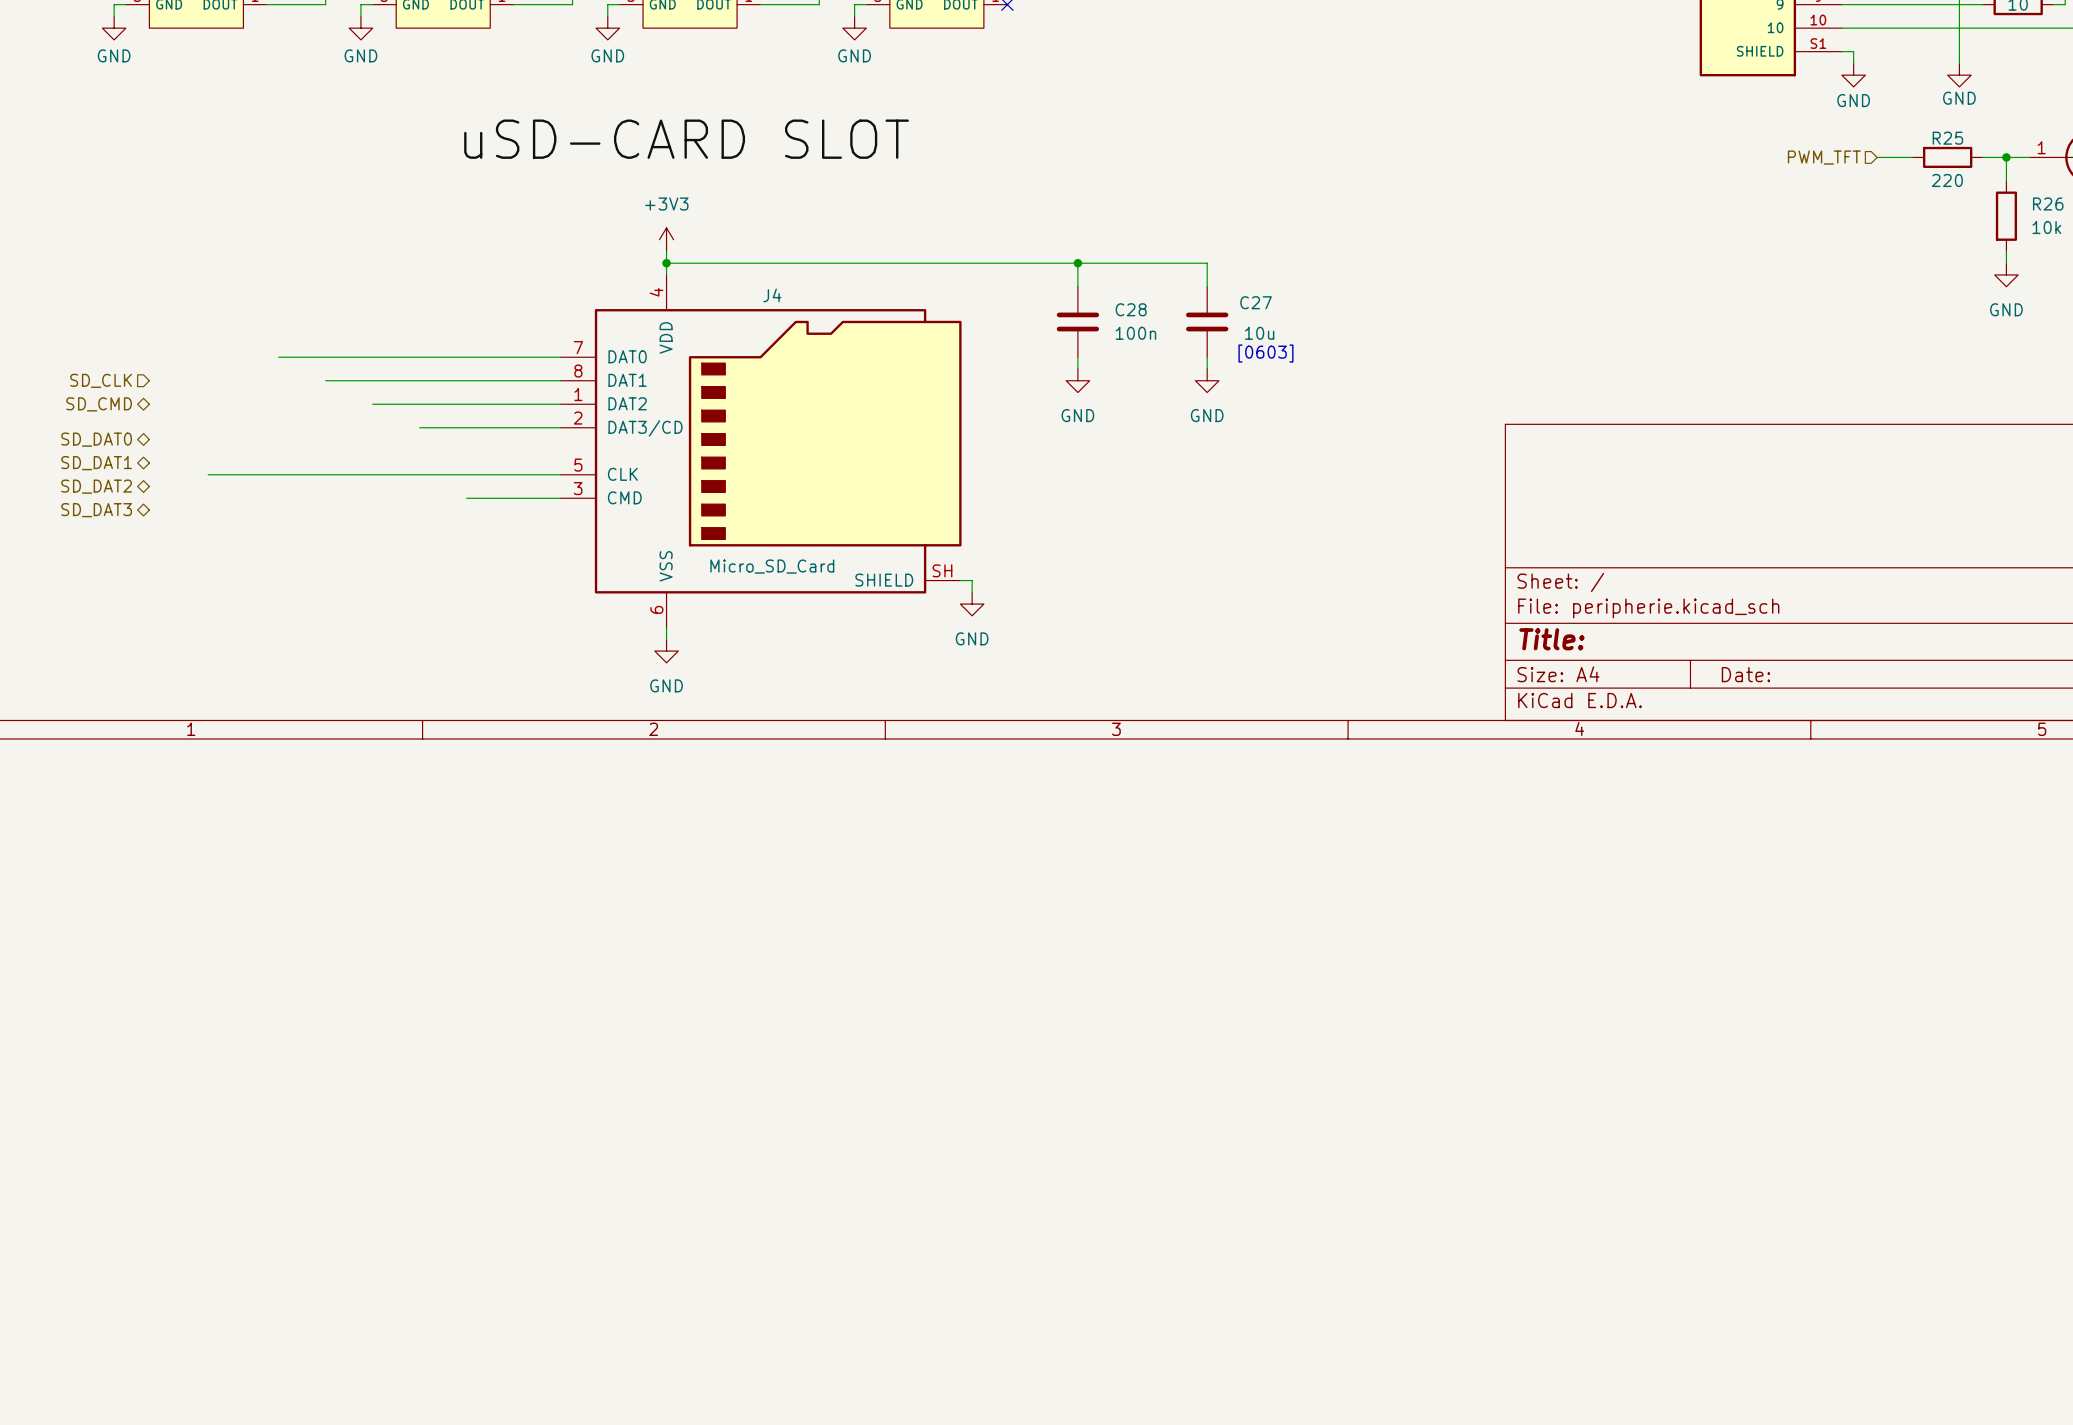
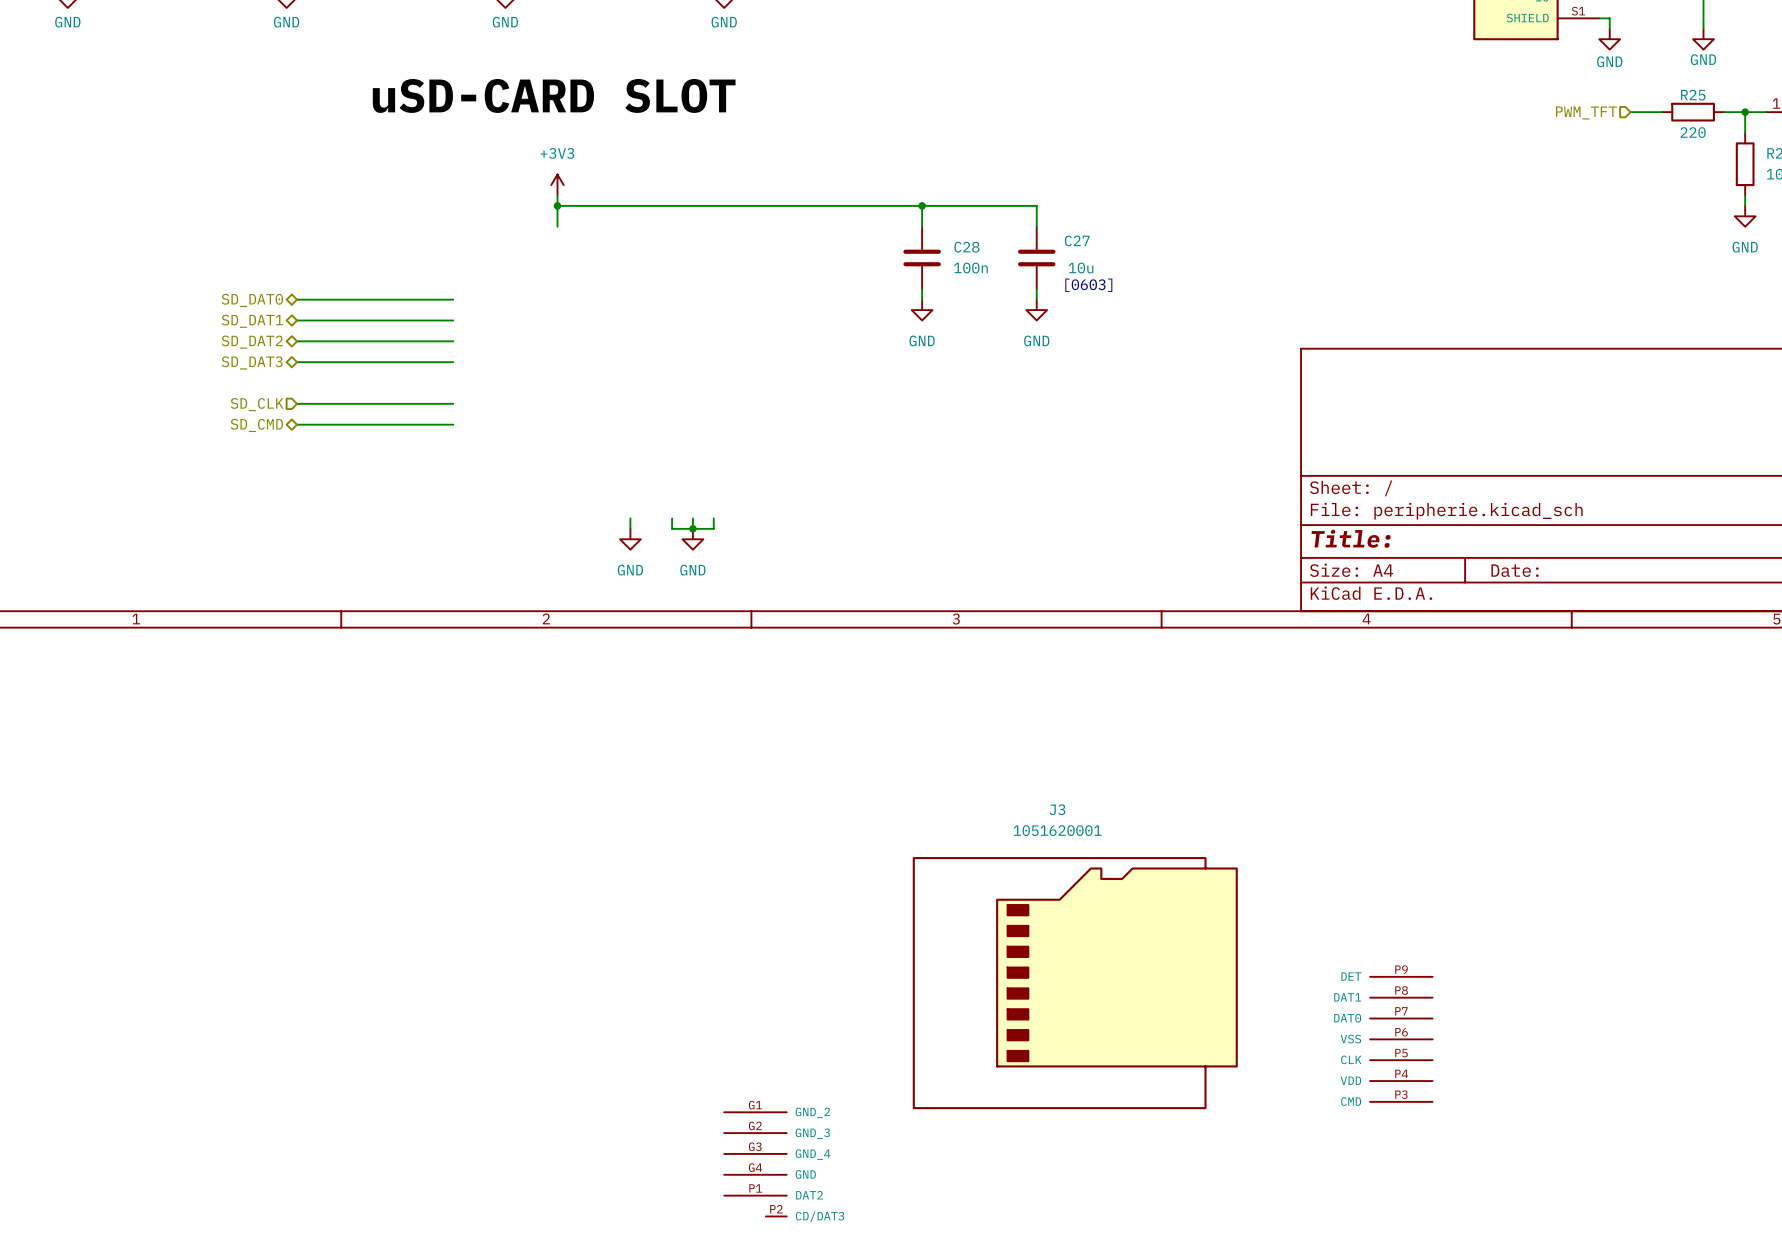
wire: (278, 357) (560, 357) -> none
wire: none -> (297, 299) (453, 299)
hierarchical label: none -> SD_DAT0 (252, 300)
hierarchical label: SD_CLK (101, 380) -> none
wire: (325, 380) (560, 380) -> none
hierarchical label: none -> SD_DAT1 (252, 321)
wire: none -> (297, 320) (453, 320)
hierarchical label: SD_CMD (99, 404) -> none
wire: (372, 404) (560, 404) -> none
hierarchical label: none -> SD_DAT2 (252, 342)
wire: none -> (297, 341) (453, 341)
wire: (419, 427) (560, 427) -> none
hierarchical label: SD_DAT0 (96, 439) -> none
hierarchical label: none -> SD_DAT3 (252, 362)
wire: none -> (297, 362) (453, 362)
J4: Micro_SD_Card (761, 451) -> none
hierarchical label: SD_DAT1 (96, 463) -> none
wire: (208, 474) (560, 474) -> none
hierarchical label: SD_DAT2 (96, 486) -> none
hierarchical label: none -> SD_CLK (257, 404)
wire: none -> (297, 403) (453, 403)
wire: (466, 498) (560, 498) -> none
hierarchical label: SD_DAT3 (96, 510) -> none
hierarchical label: none -> SD_CMD (256, 425)
wire: none -> (297, 424) (453, 424)
wire: (960, 580) (972, 580) (972, 592) -> none
power symbol: GND (972, 604) -> none
wire: none -> (672, 518) (672, 528) (713, 528) (713, 518)
wire: none -> (692, 518) (692, 528)
wire: (666, 627) (666, 639) -> (630, 518) (630, 528)
junction: none -> (692, 528)
power symbol: none -> GND (630, 539)
power symbol: none -> GND (692, 539)
power symbol: GND (666, 651) -> none
J3: none -> 1051620001 (1078, 1036)

